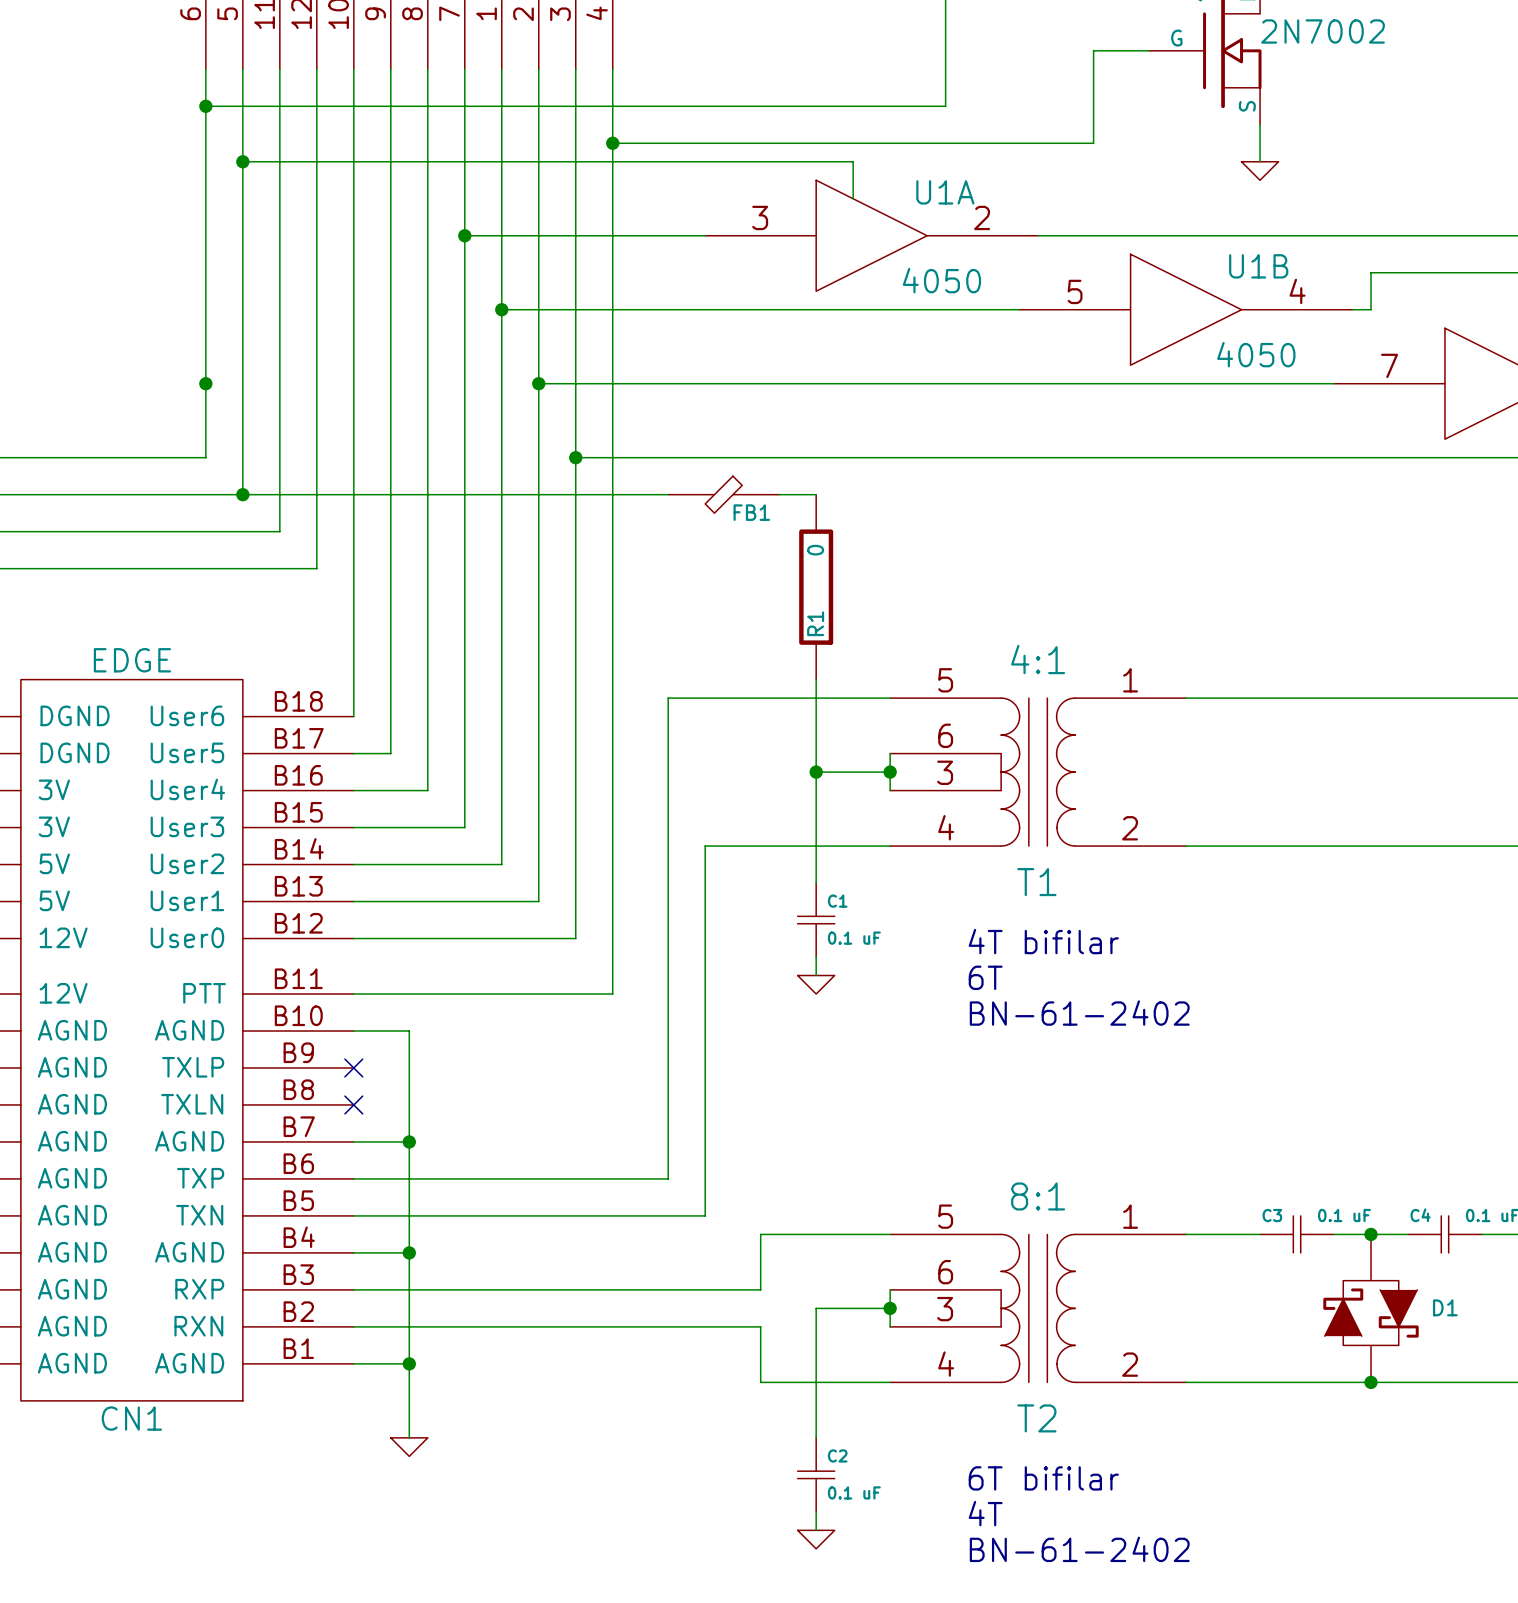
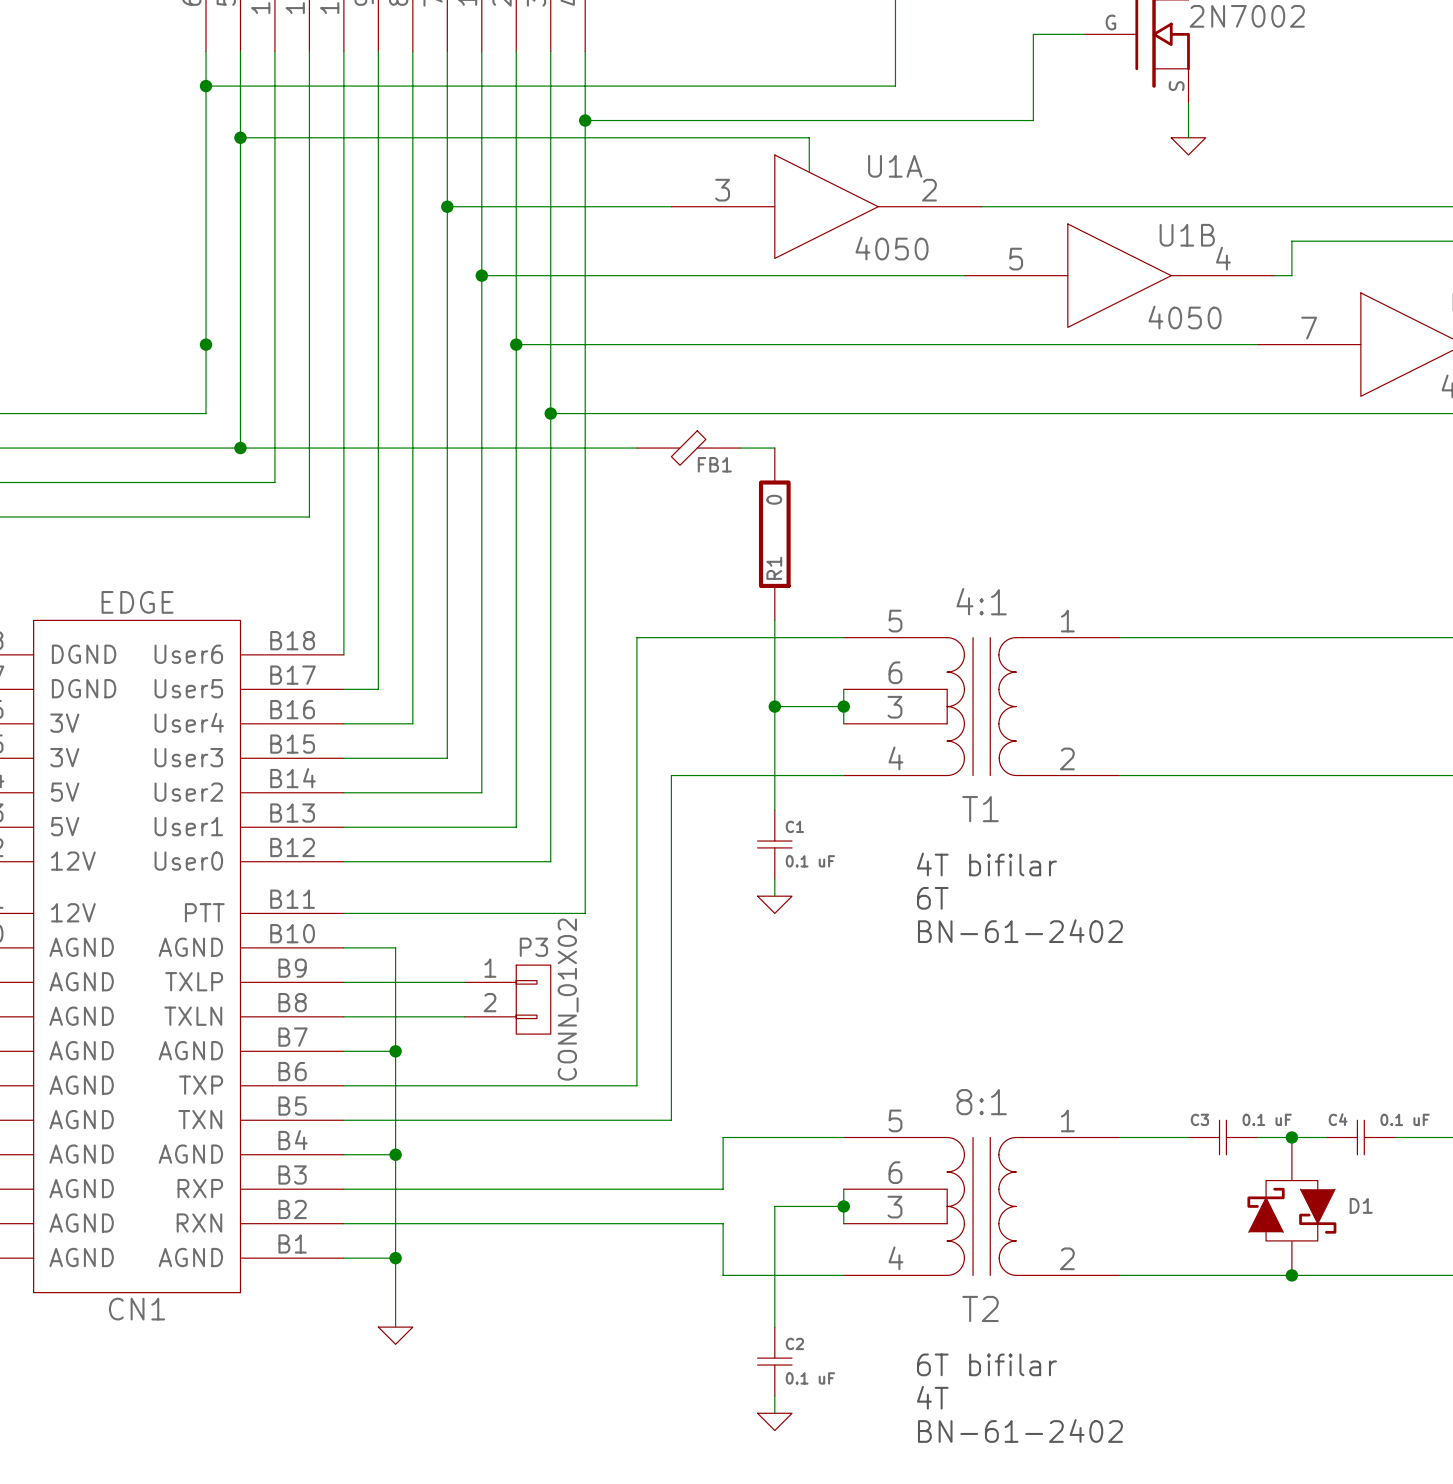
wire: none -> (343, 982) (464, 982)
no-connect mark: (353, 1067) -> none
P3: none -> CONN_01X02 (507, 999)
wire: none -> (343, 1016) (464, 1016)
no-connect mark: (353, 1104) -> none

